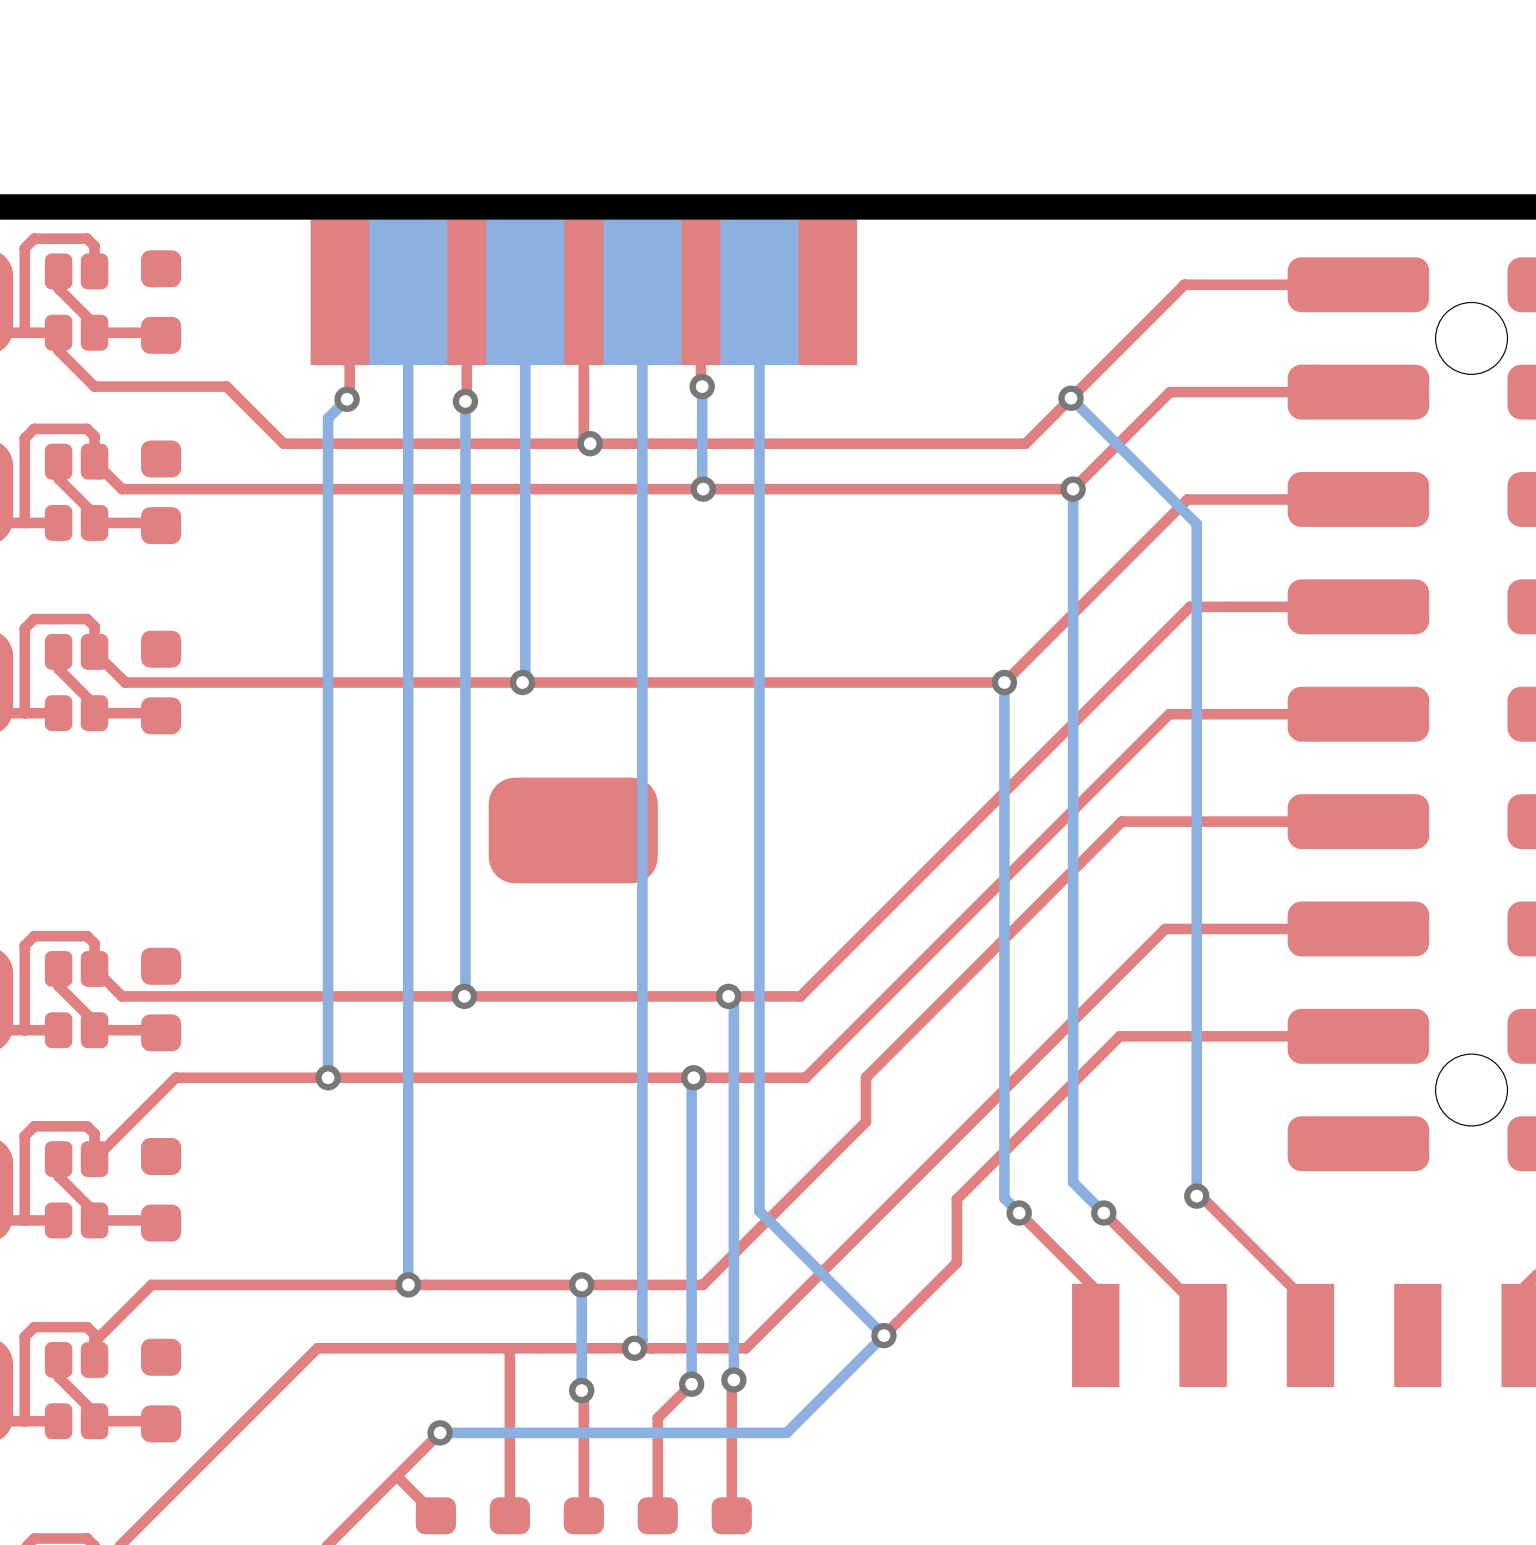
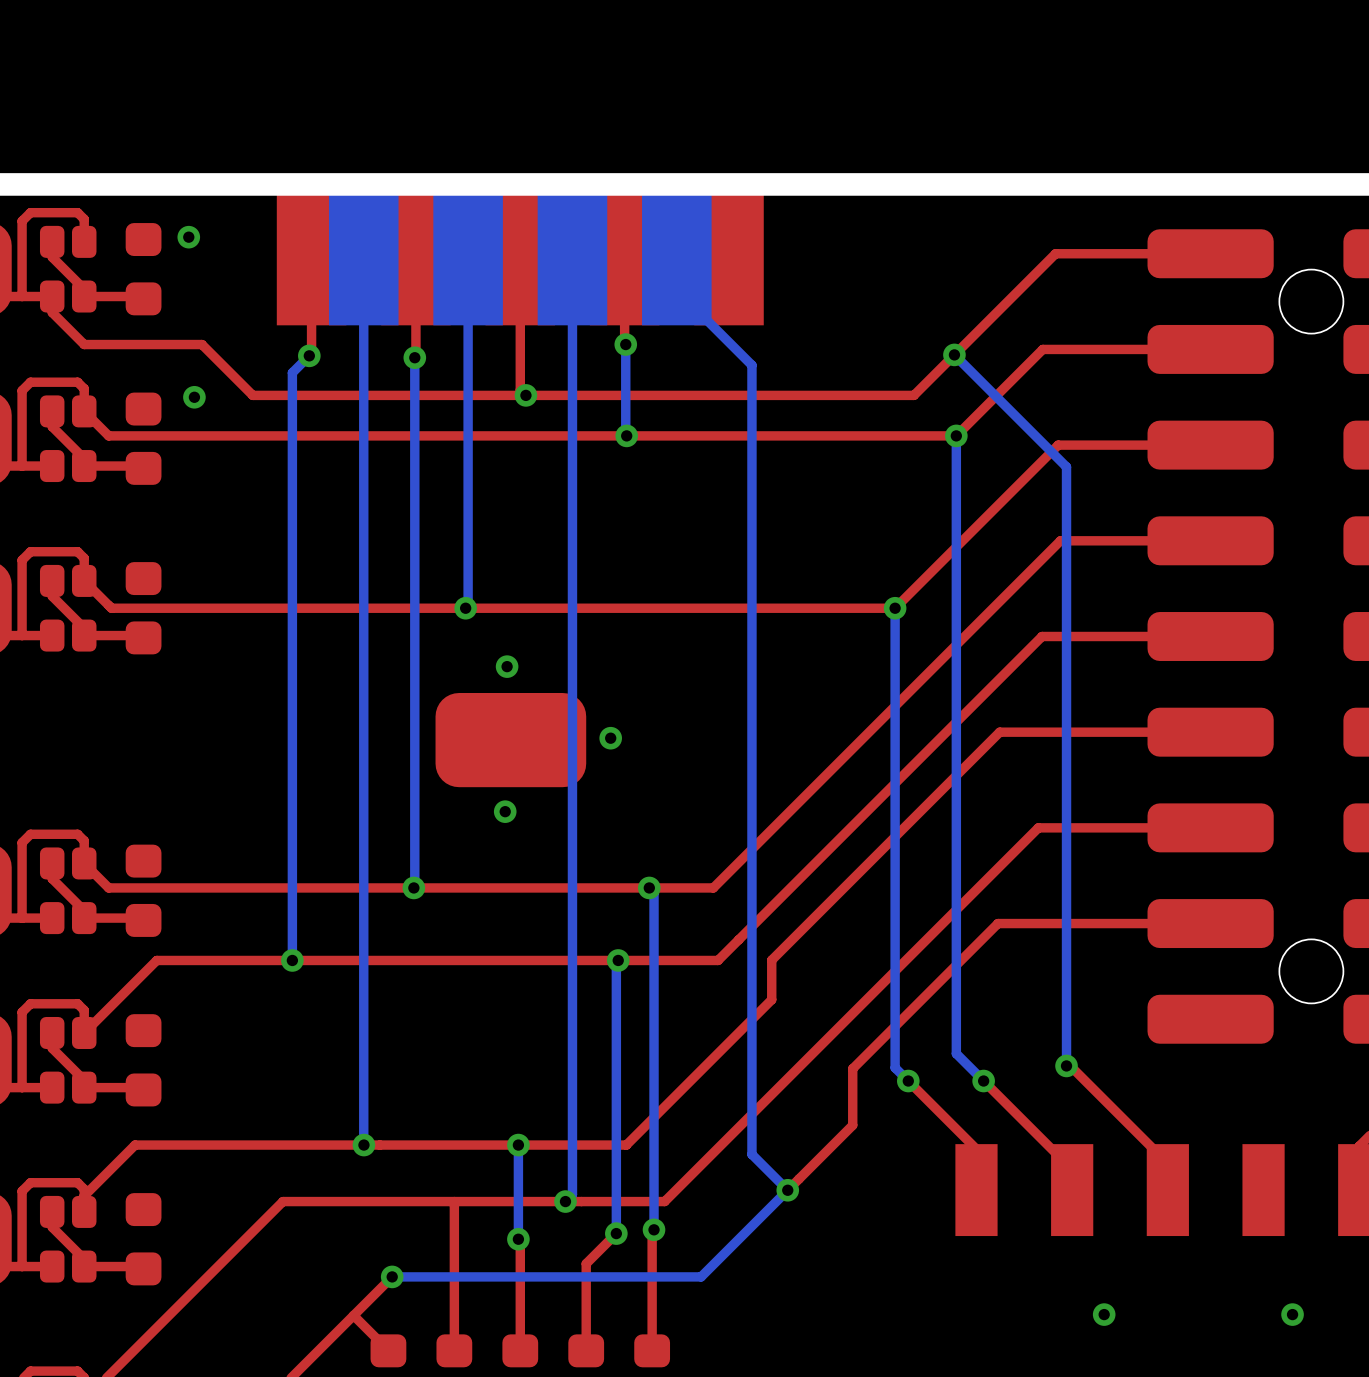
via: none -> (188, 237)
bottom track: (759, 325) (759, 1211) (843, 1295) -> (676, 290) (751, 365) (751, 1154)
via: none -> (194, 397)
via: none -> (507, 666)
via: none -> (610, 738)
via: none -> (505, 811)
via: none -> (1104, 1314)
via: none -> (1292, 1314)

